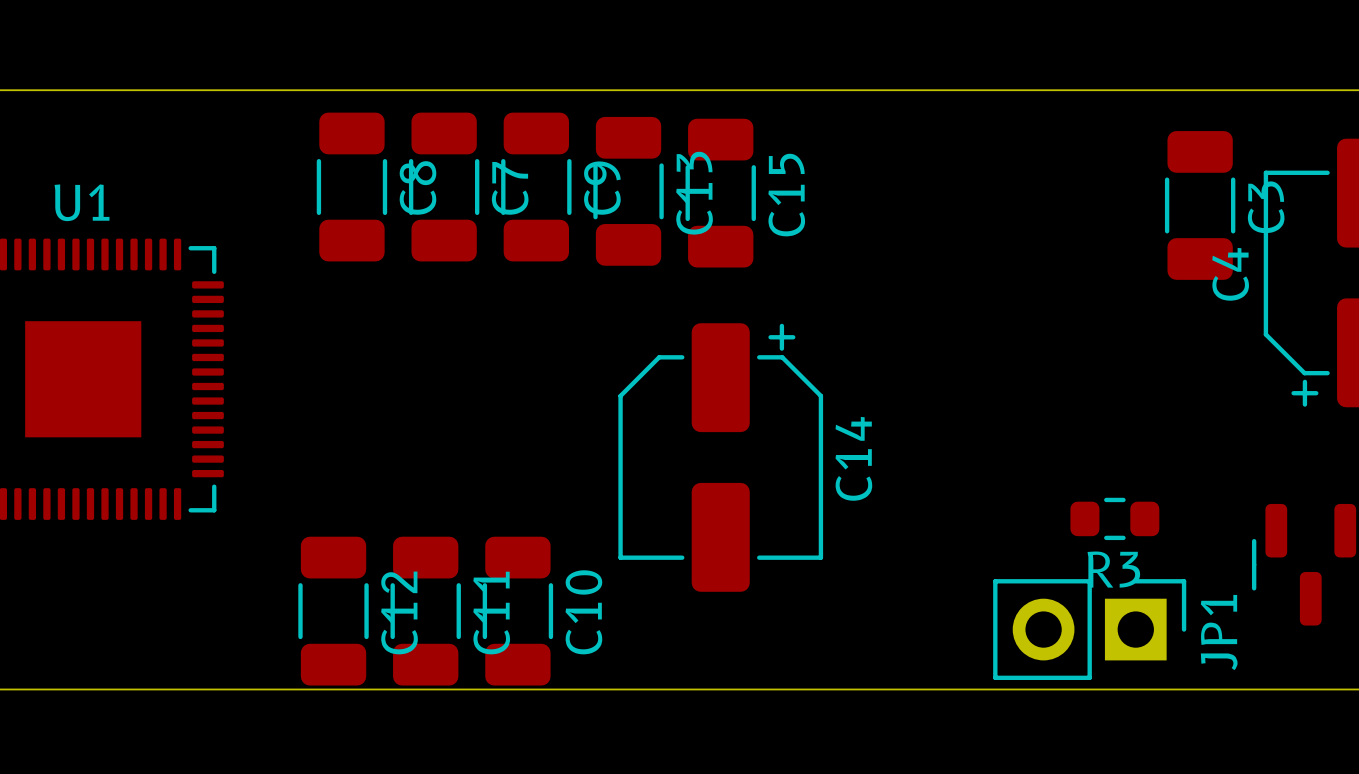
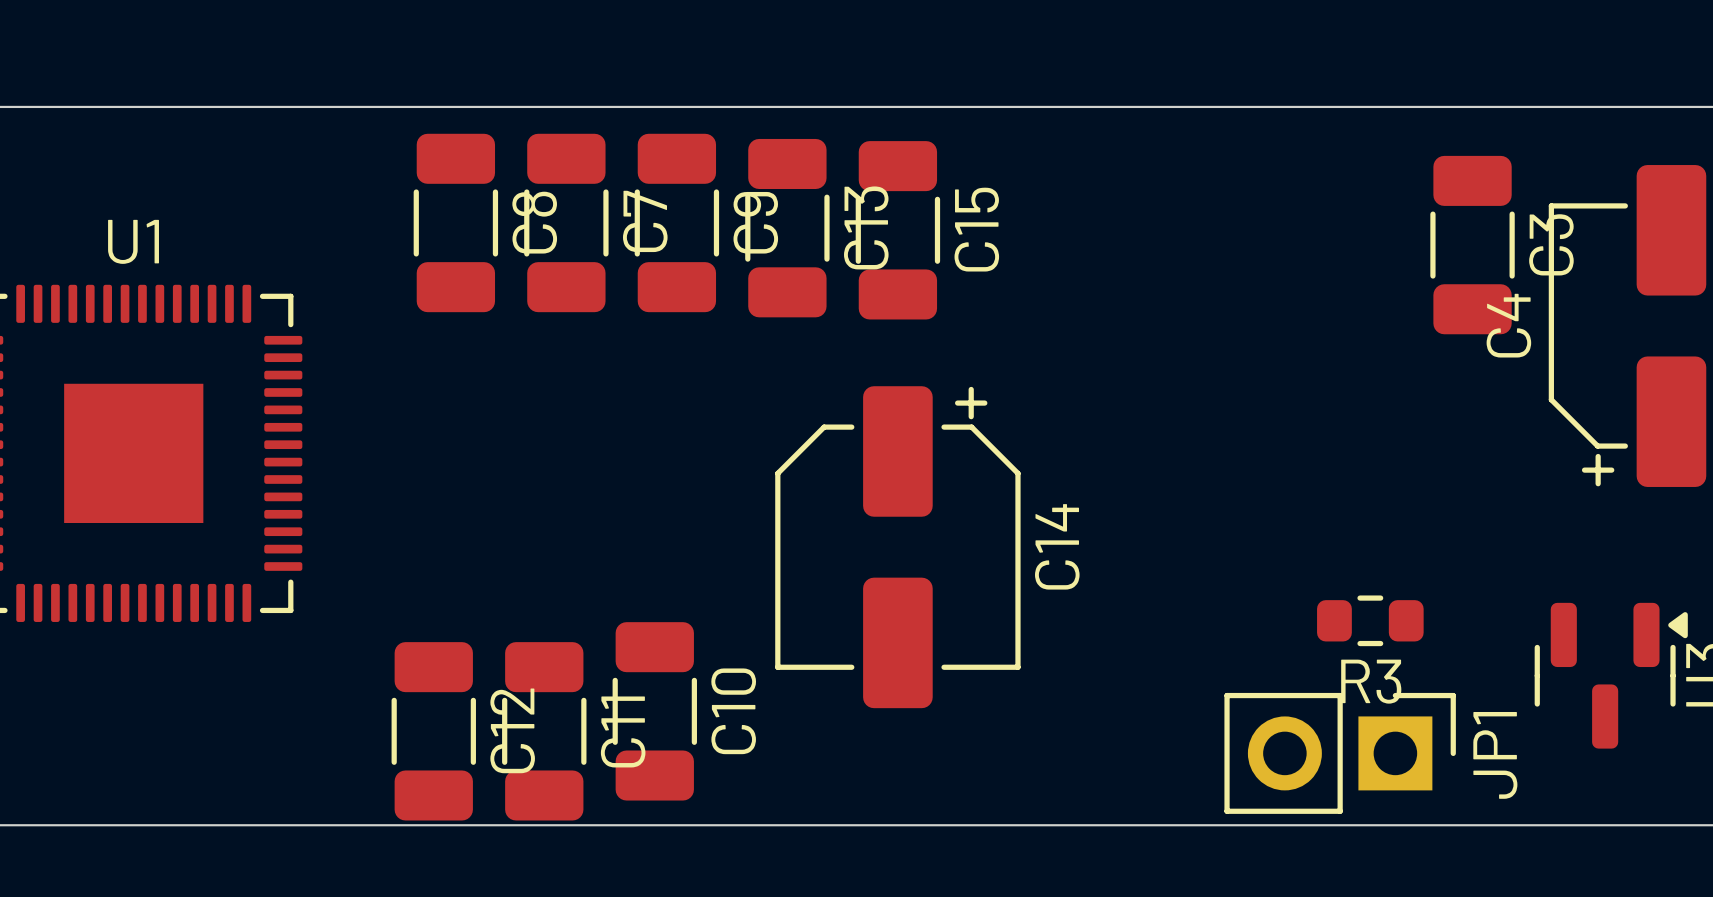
C10 position: (517, 611) -> (654, 711)

